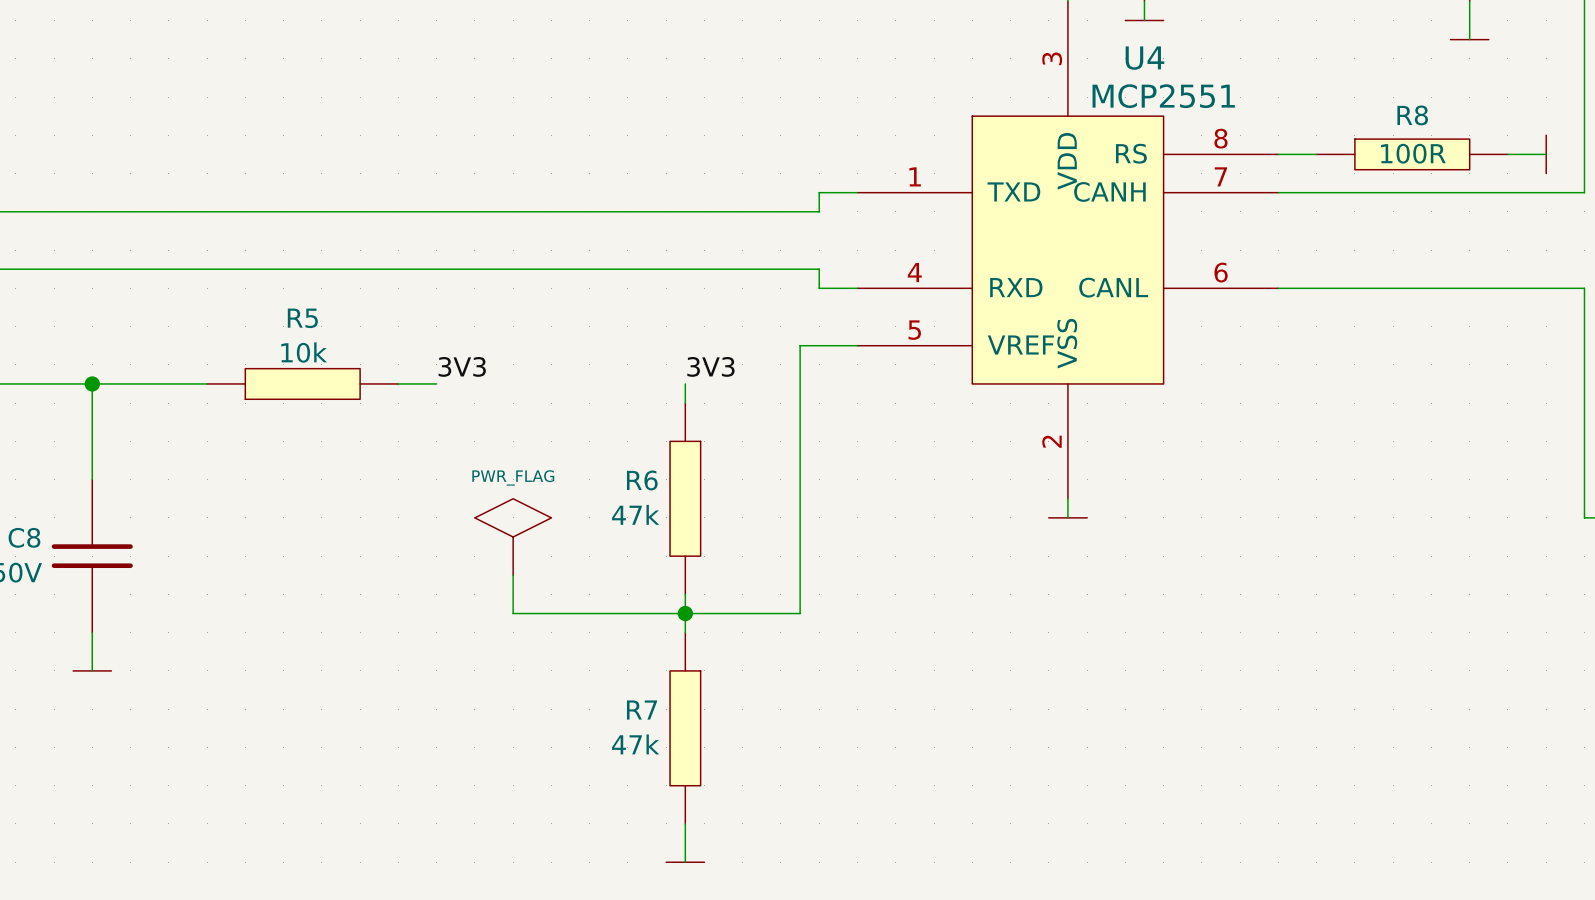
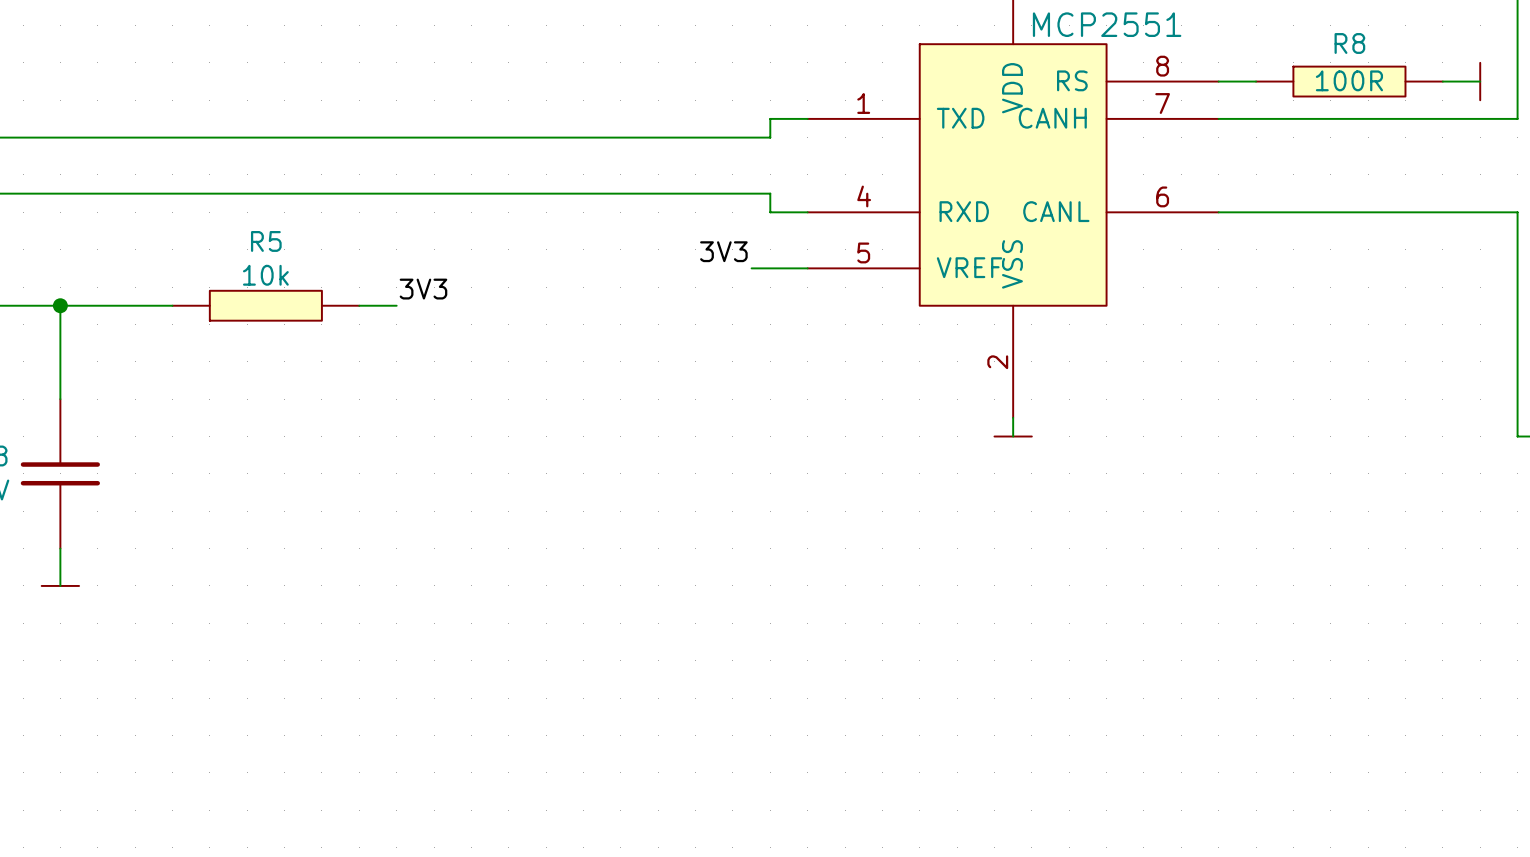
wire: (800, 345) (800, 613) (513, 613) (513, 575) -> none
label position: 3V3 (710, 366) -> 3V3 (723, 251)
wire: (685, 383) (685, 403) -> none
R6: 47k (685, 498) -> none
power symbol: PWR_FLAG (513, 537) -> none
wire: (685, 594) (685, 632) -> none
junction: (685, 613) -> none
R7: 47k (685, 728) -> none
wire: (685, 823) (685, 862) -> none
power symbol: (685, 862) -> none

